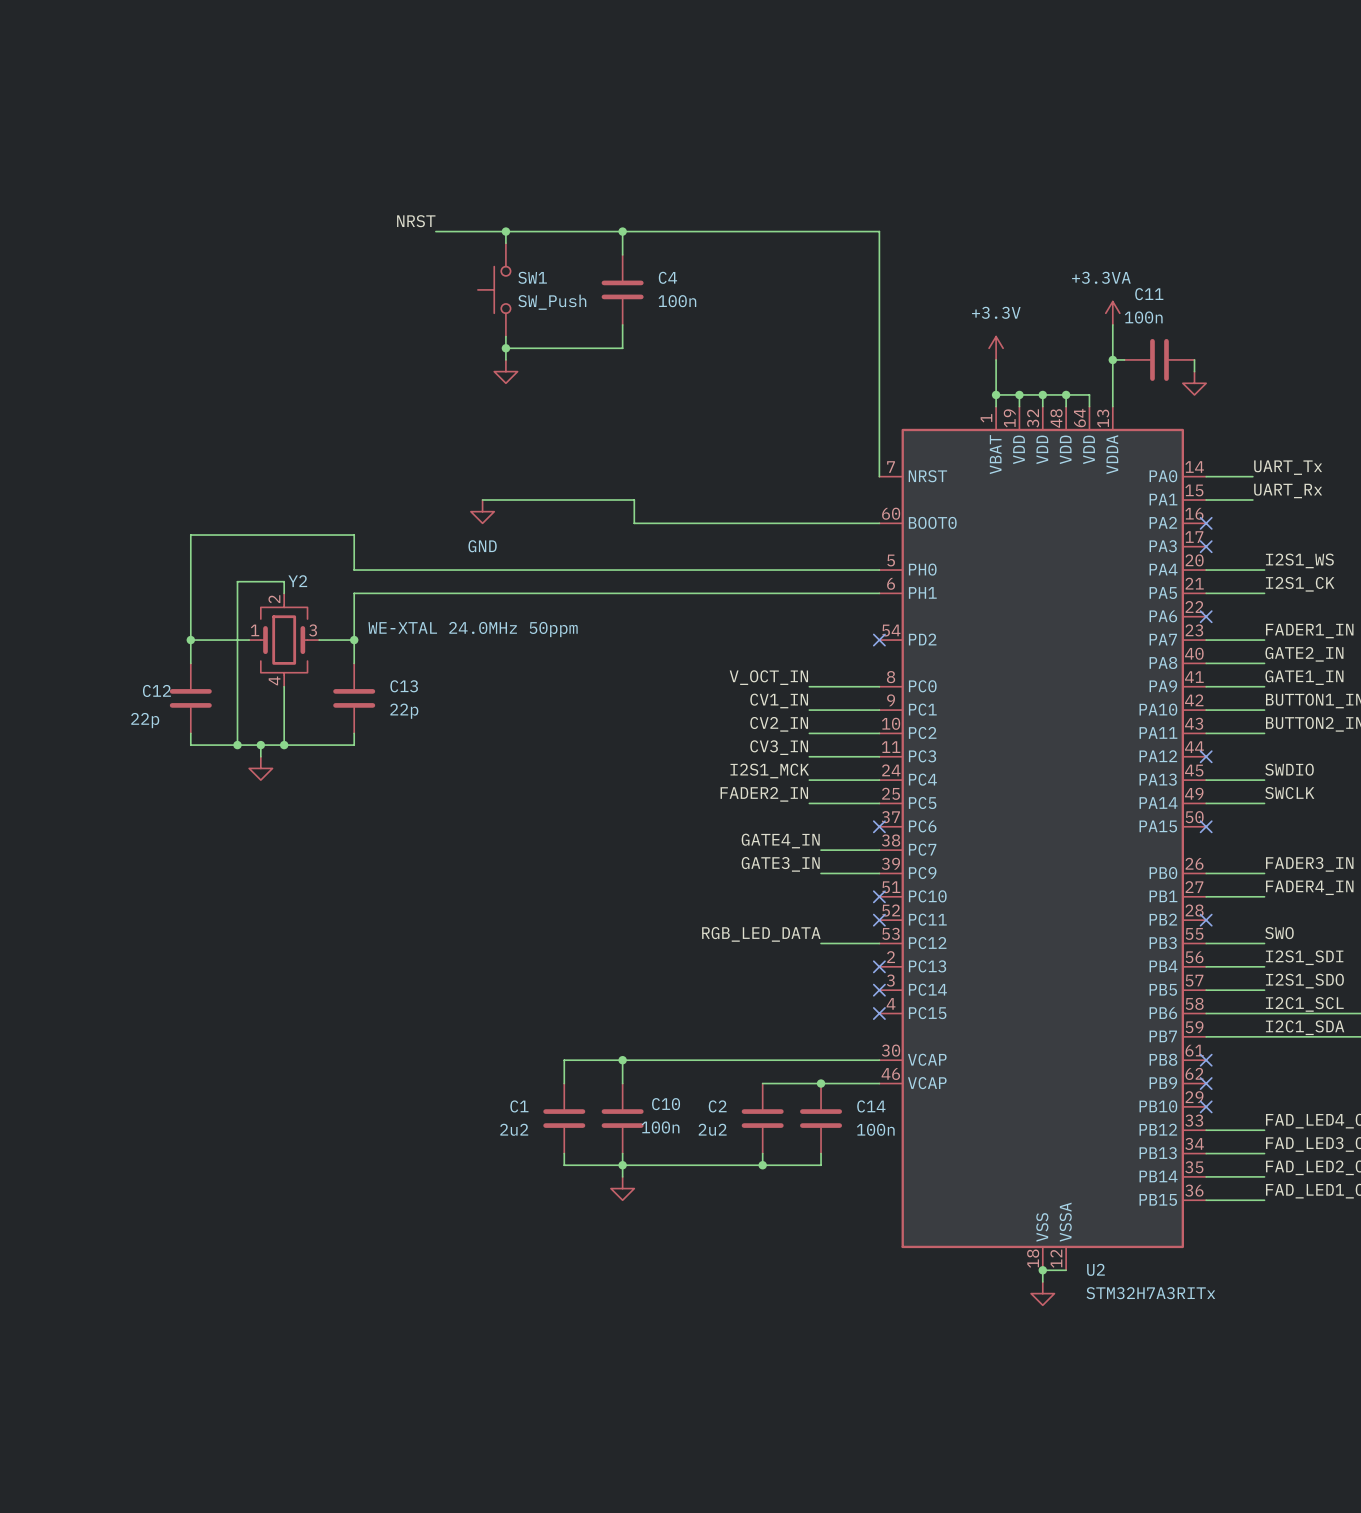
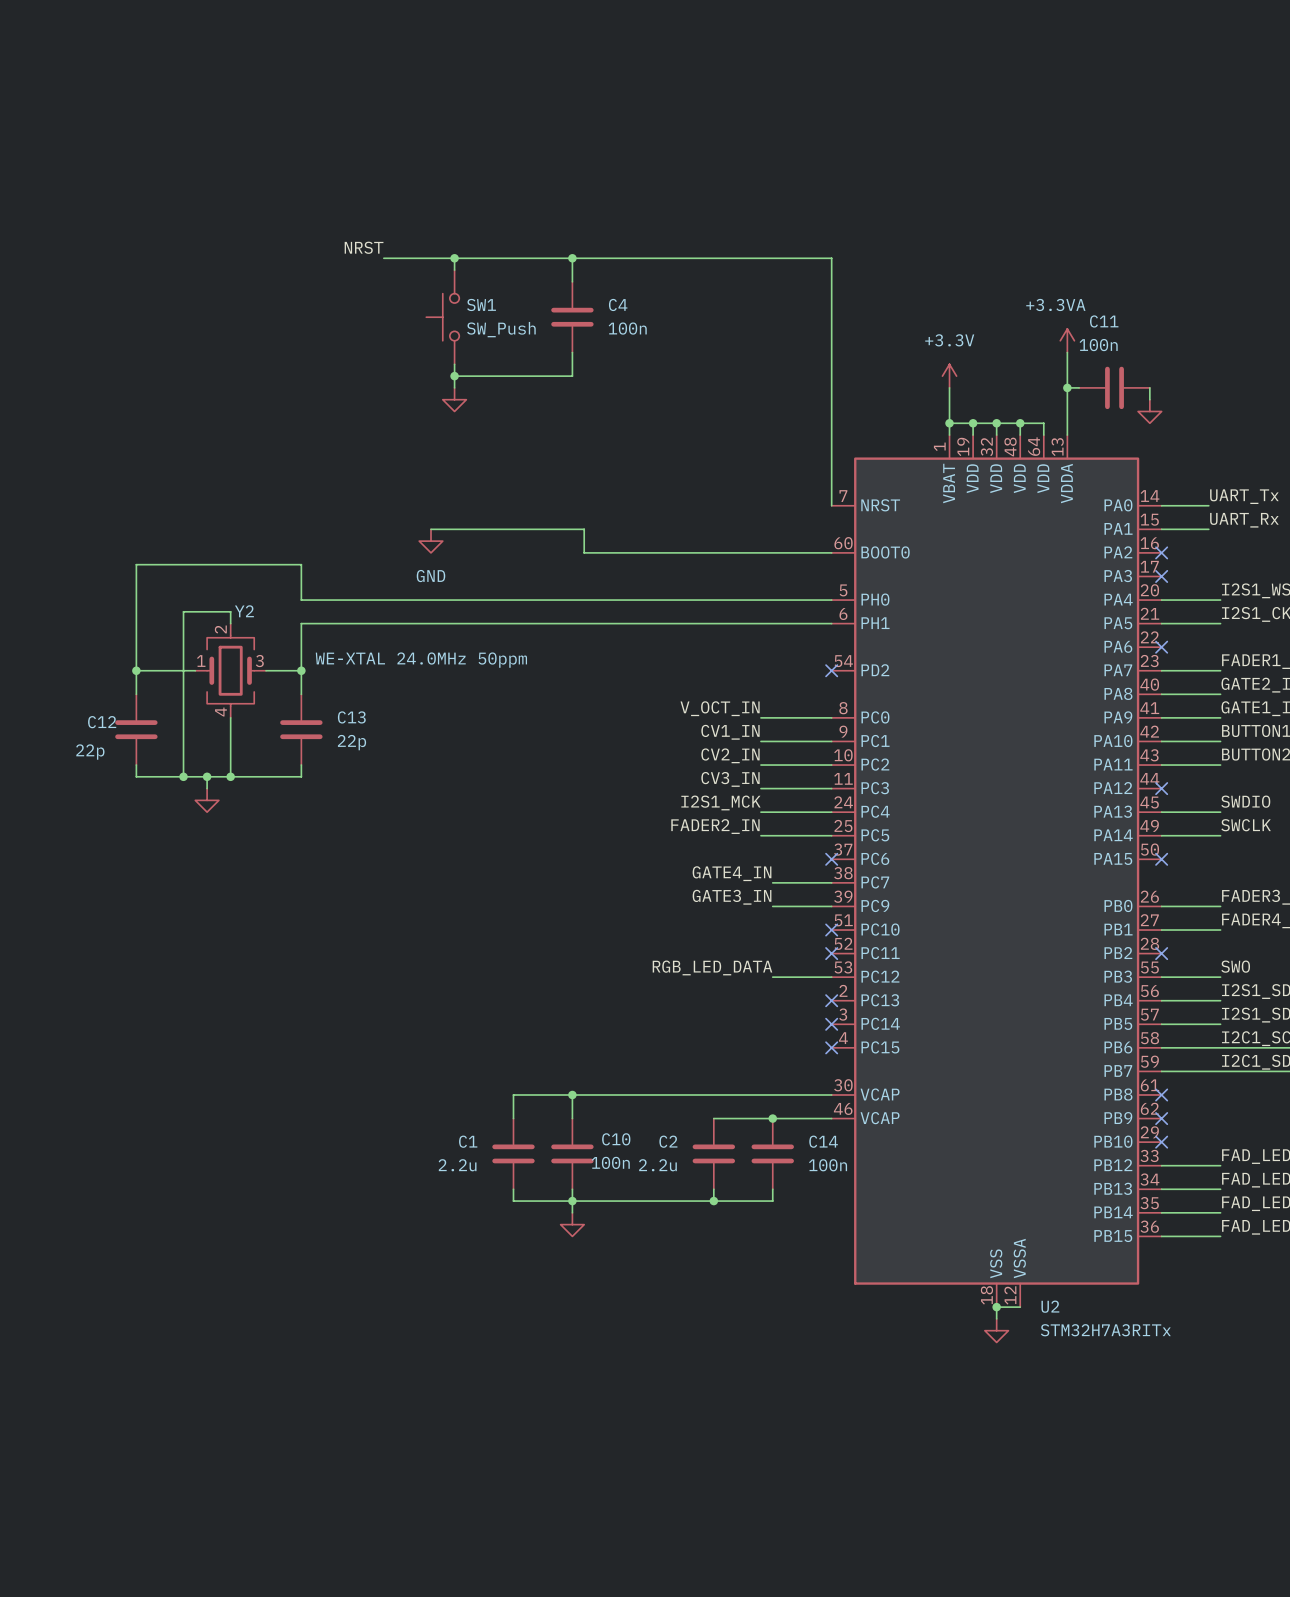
C1 value: 2u2 (514, 1129) -> 2.2u (457, 1165)
C2 value: 2u2 (712, 1129) -> 2.2u (657, 1165)

